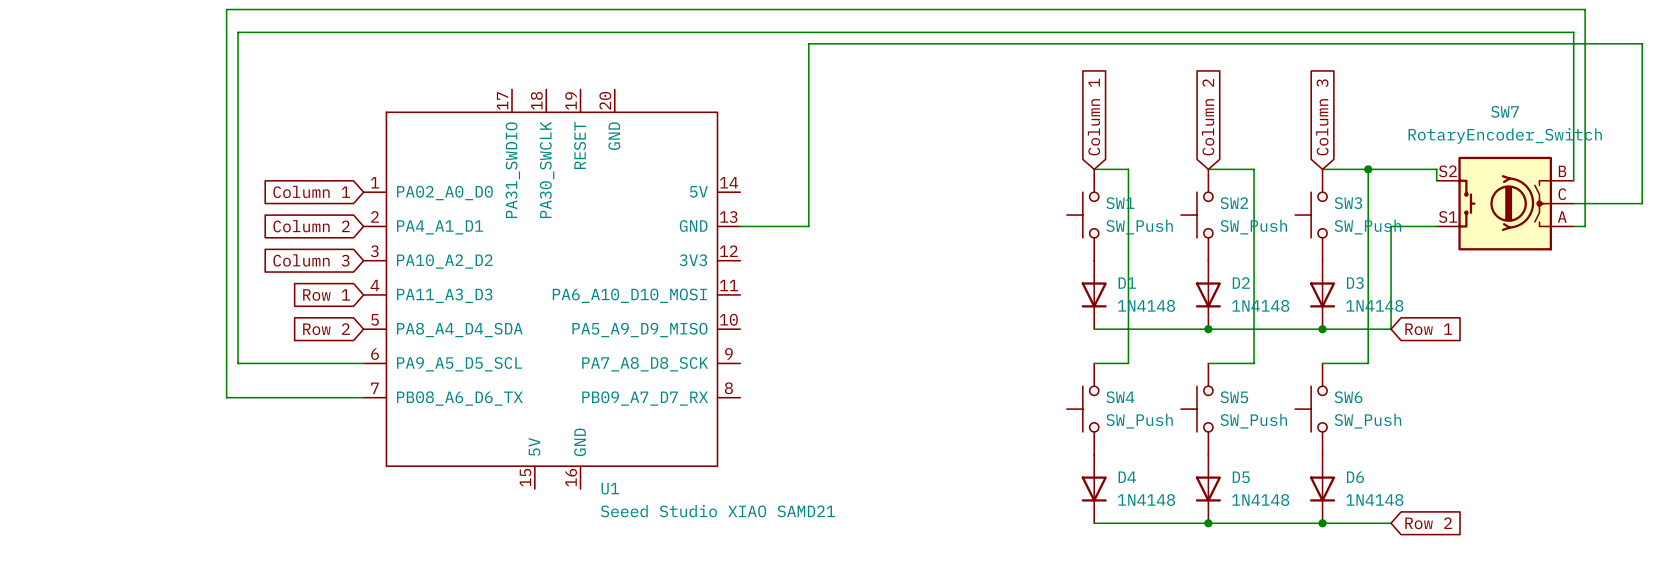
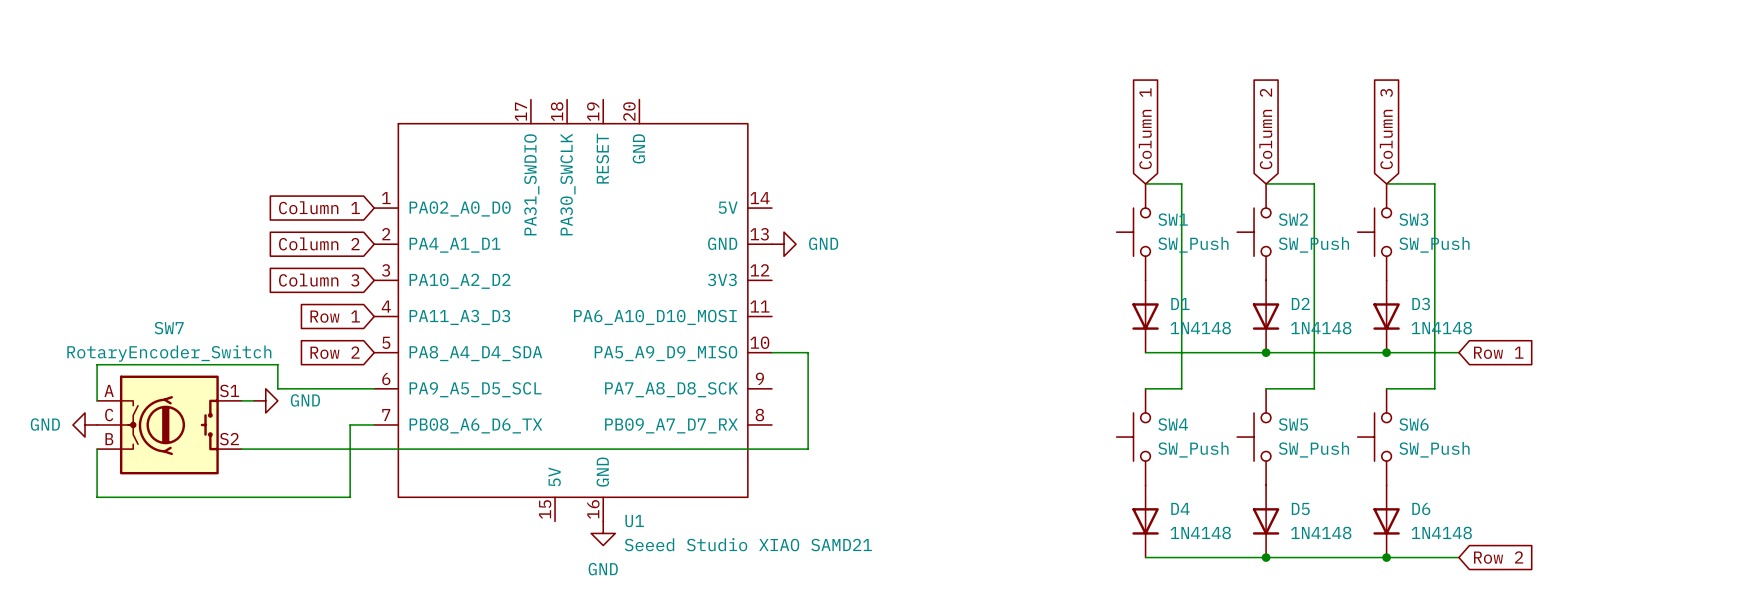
wire: (1368, 169) (1436, 169) (1436, 180) -> none
junction: (1368, 169) -> none
wire: (1573, 180) (1573, 32) (238, 32) (238, 363) (272, 363) -> (97, 400) (97, 364) (277, 364) (277, 388)
SW7 rotation: 0° (1505, 203) -> 180° (169, 424)
SW7 position: (1505, 203) -> (169, 424)
wire: (1573, 203) (1642, 203) (1642, 43) (808, 43) (808, 226) (740, 226) -> none
power symbol: none -> GND (784, 244)
wire: (1436, 226) (1391, 226) (1391, 329) -> none
wire: (1573, 226) (1585, 226) (1585, 9) (226, 9) (226, 397) (340, 397) -> (97, 449) (97, 497) (350, 497) (350, 424)
wire: none -> (771, 352) (808, 352) (808, 449) (241, 449)
wire: none -> (241, 400) (253, 400)
power symbol: none -> GND (265, 400)
power symbol: none -> GND (85, 424)
power symbol: none -> GND (603, 533)

